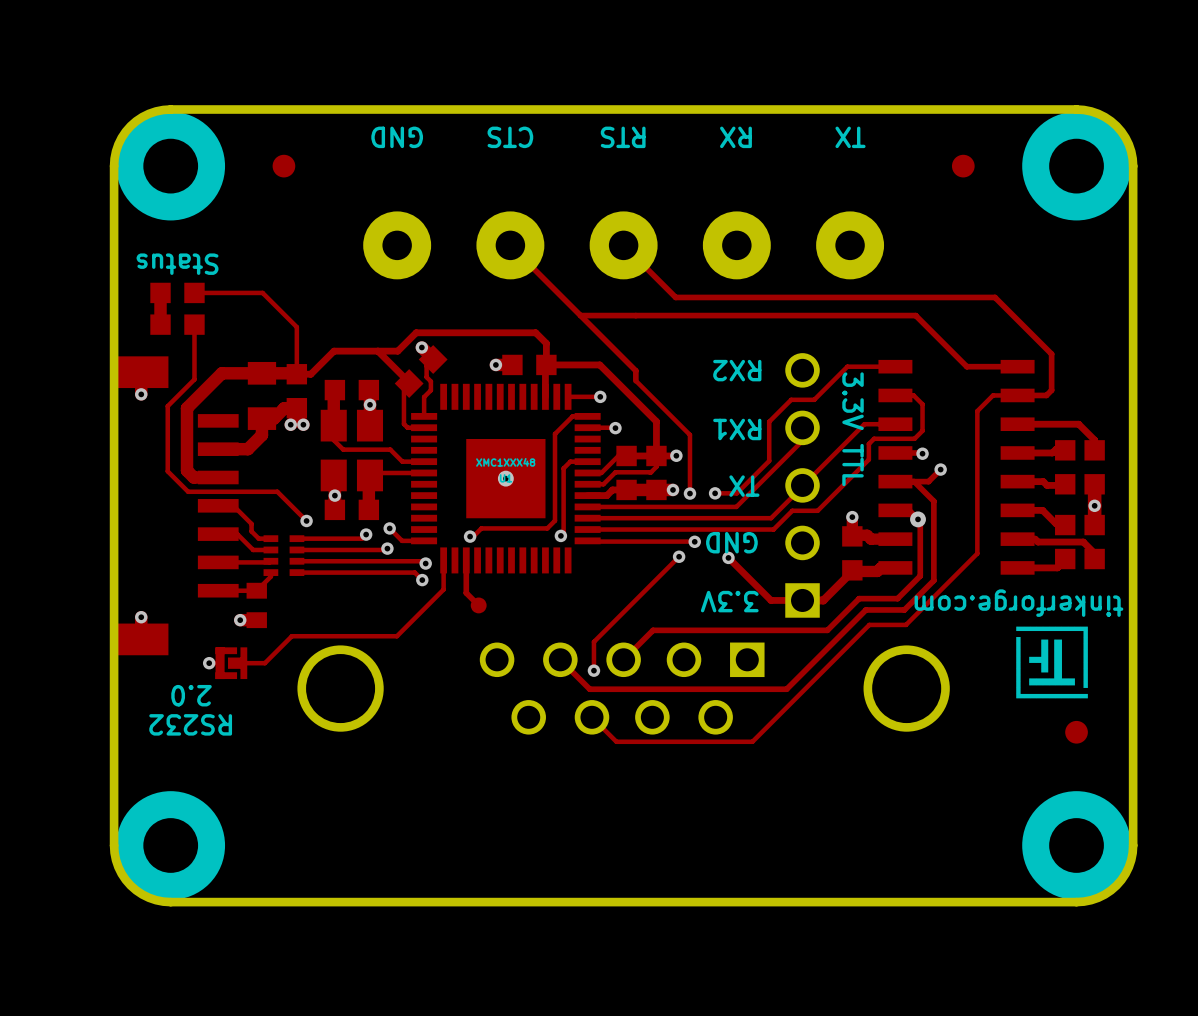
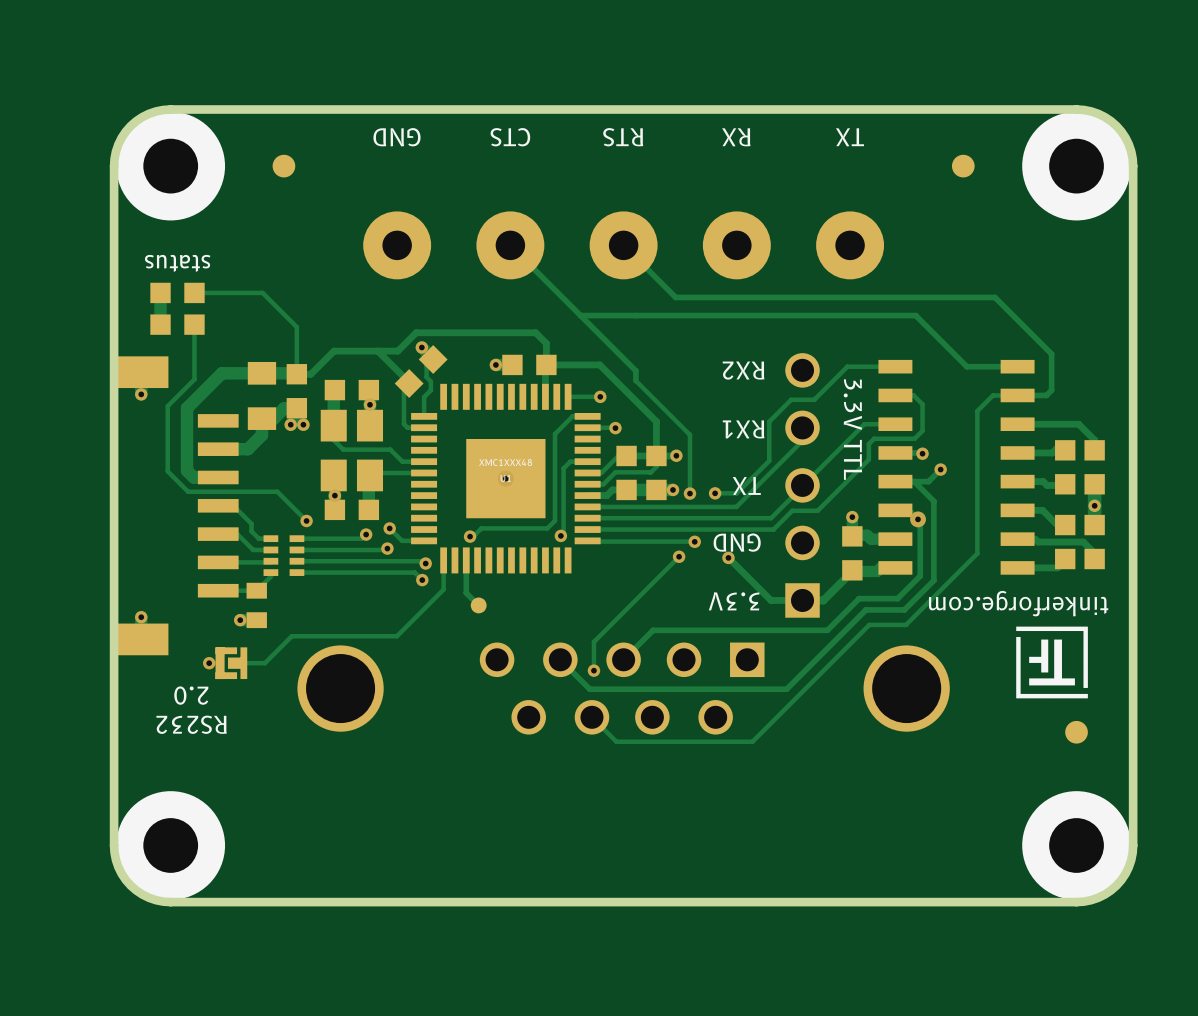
text: Status (177, 264) -> status (177, 263)

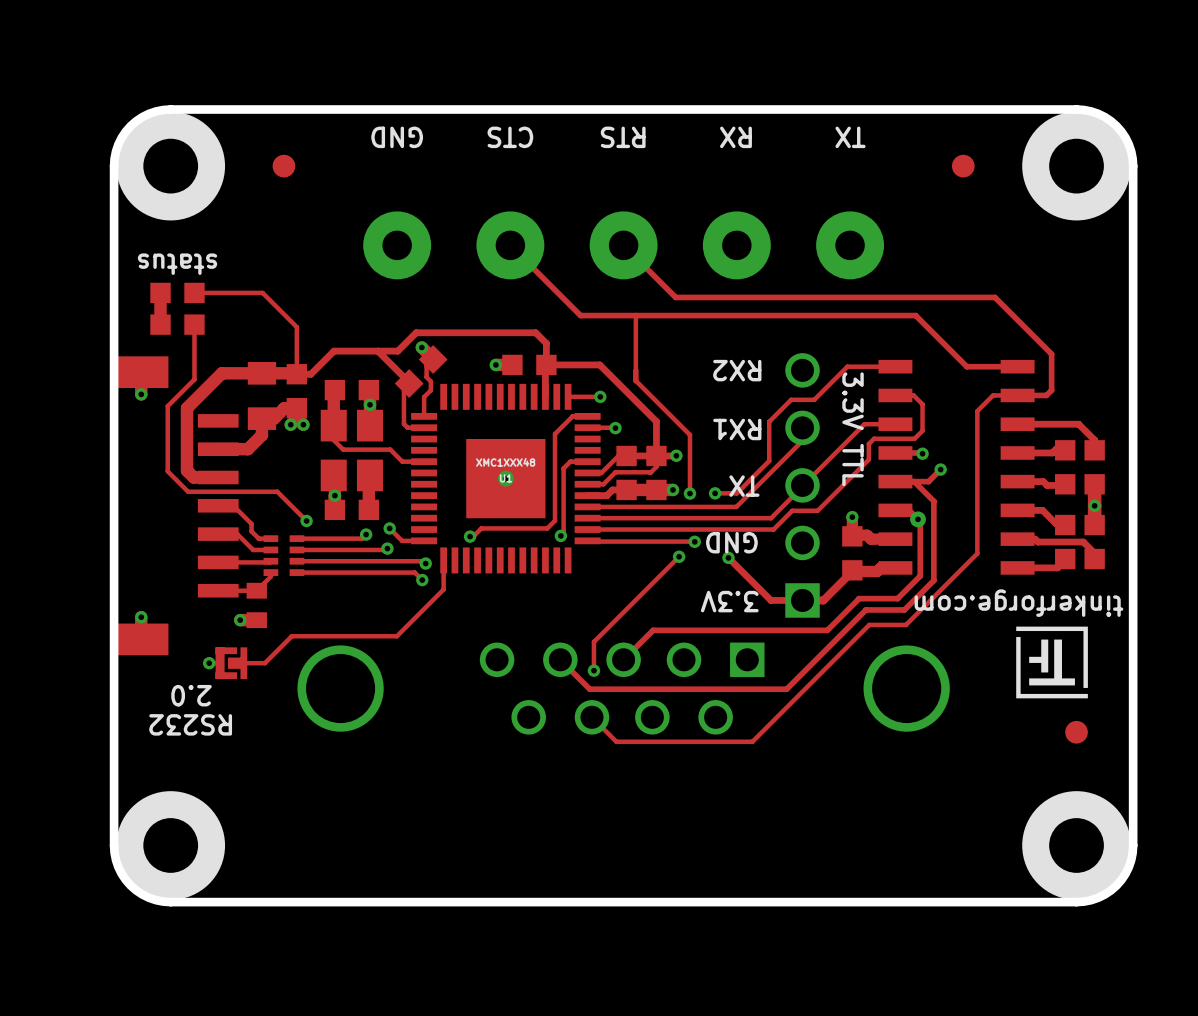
track: (580, 315) (635, 370) -> (635, 315) (635, 370)
track: (424, 472) (372, 472) (369, 475) -> none
track: (466, 560) (466, 593) (478, 605) -> none
part: (478, 605) -> none

